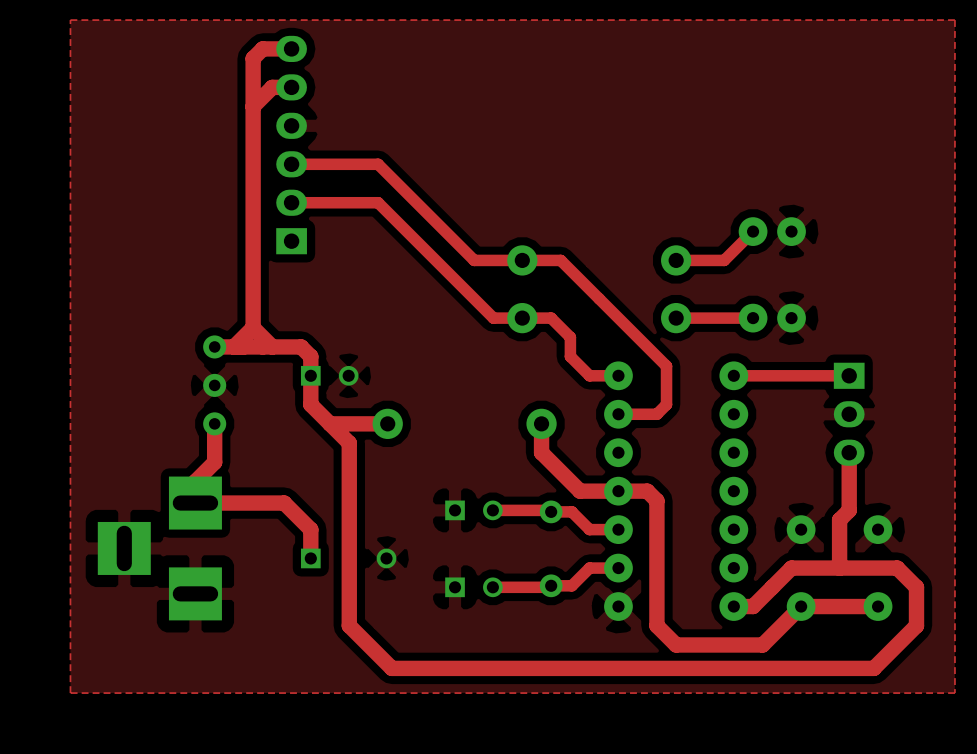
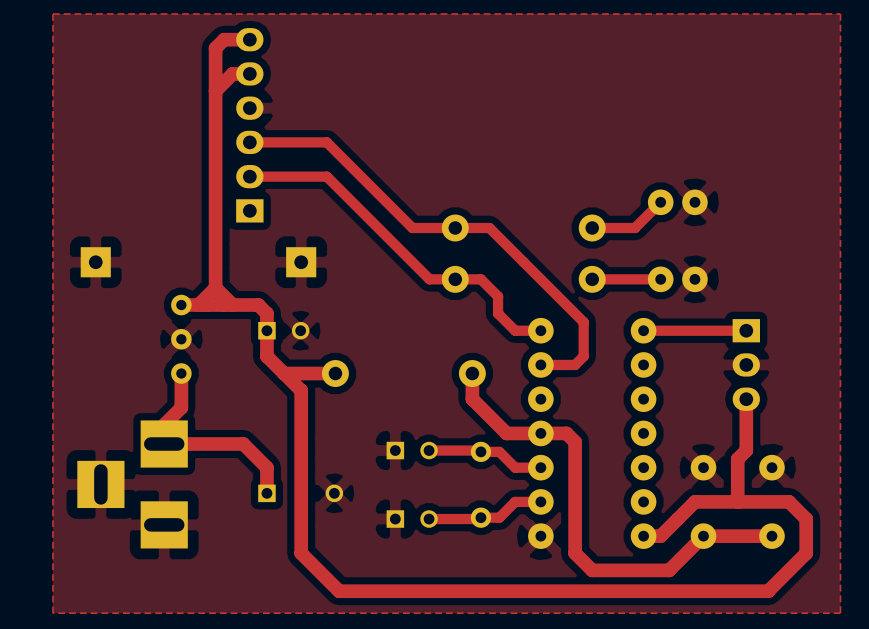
part: none -> (95, 262)
part: none -> (301, 262)

